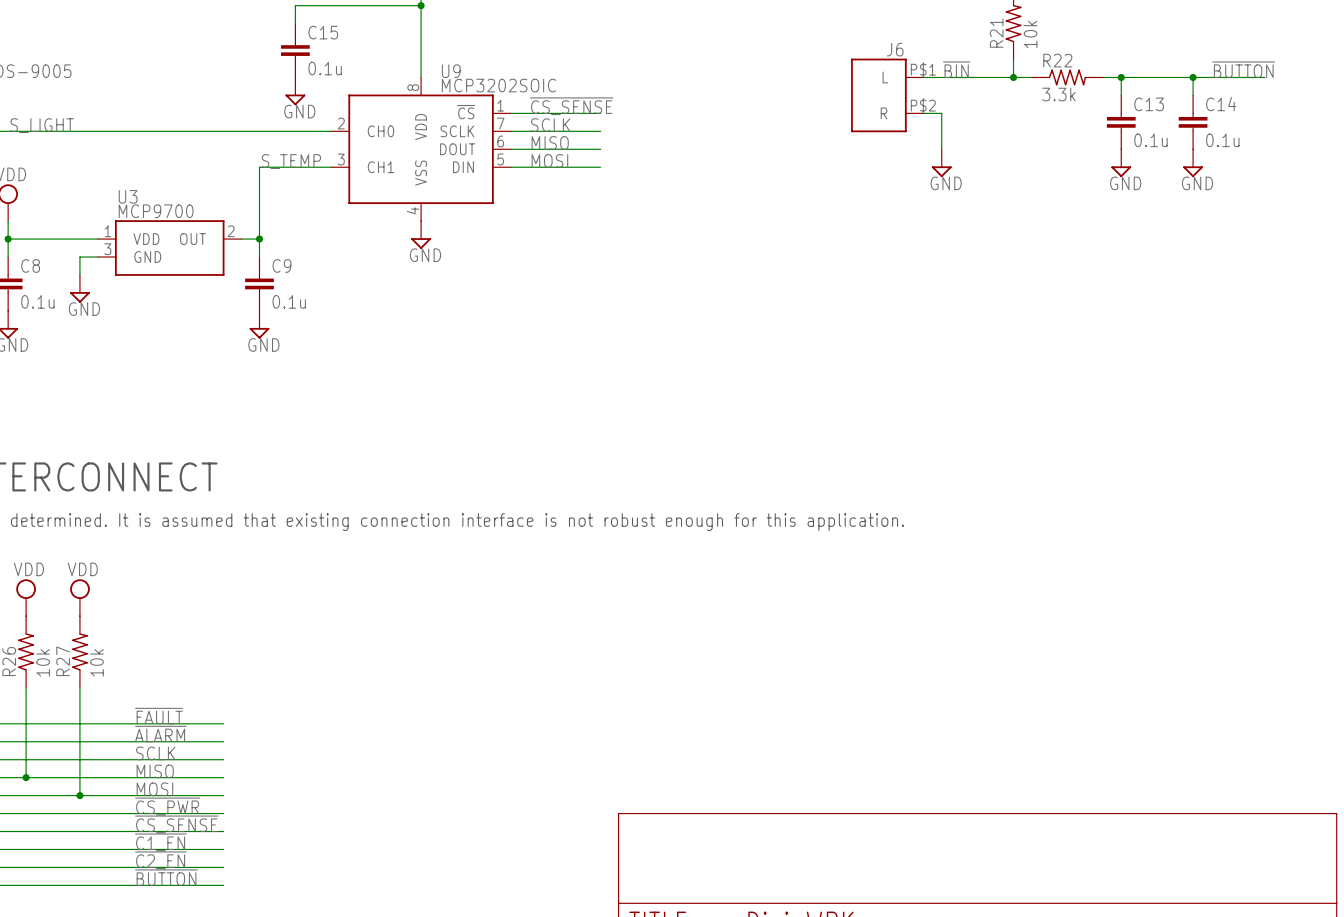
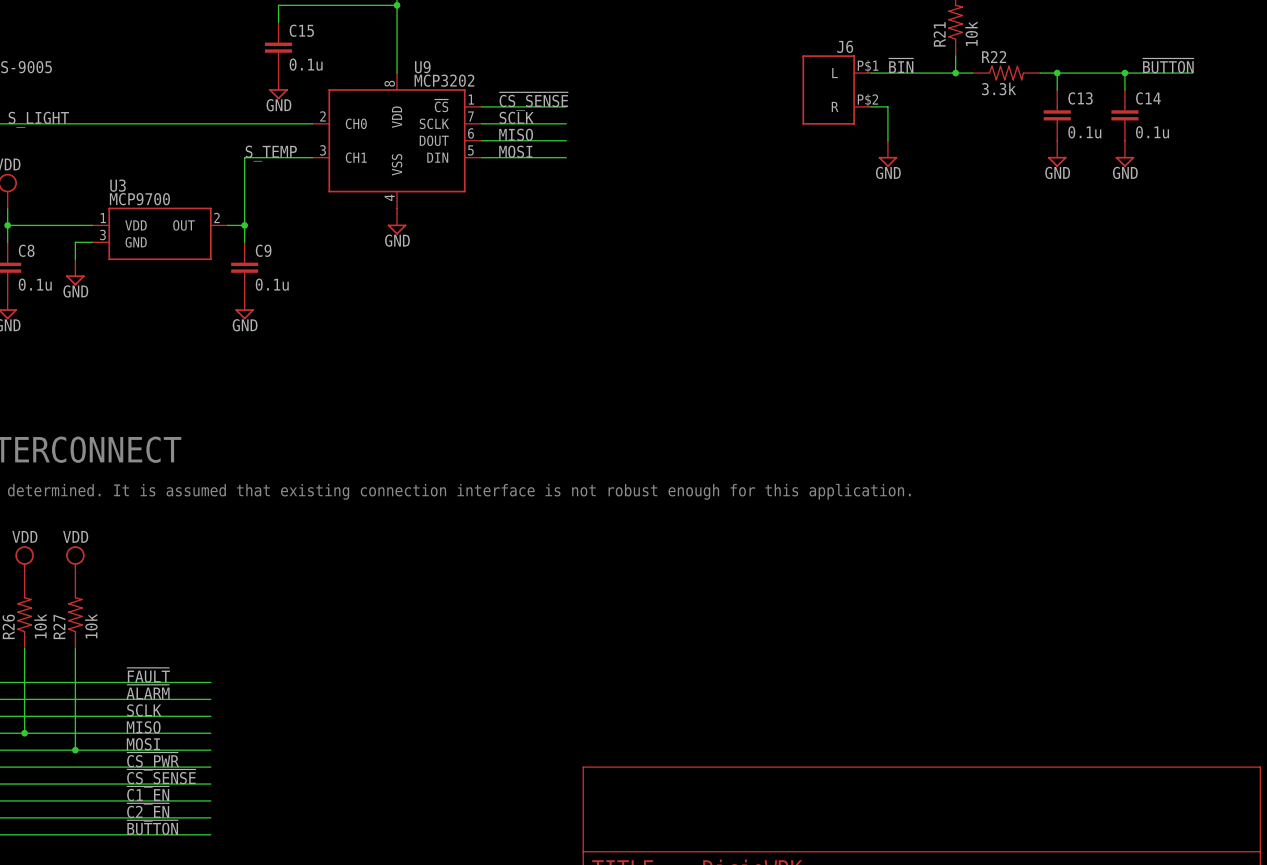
U9 value: MCP3202SOIC (498, 85) -> MCP3202 (444, 80)

